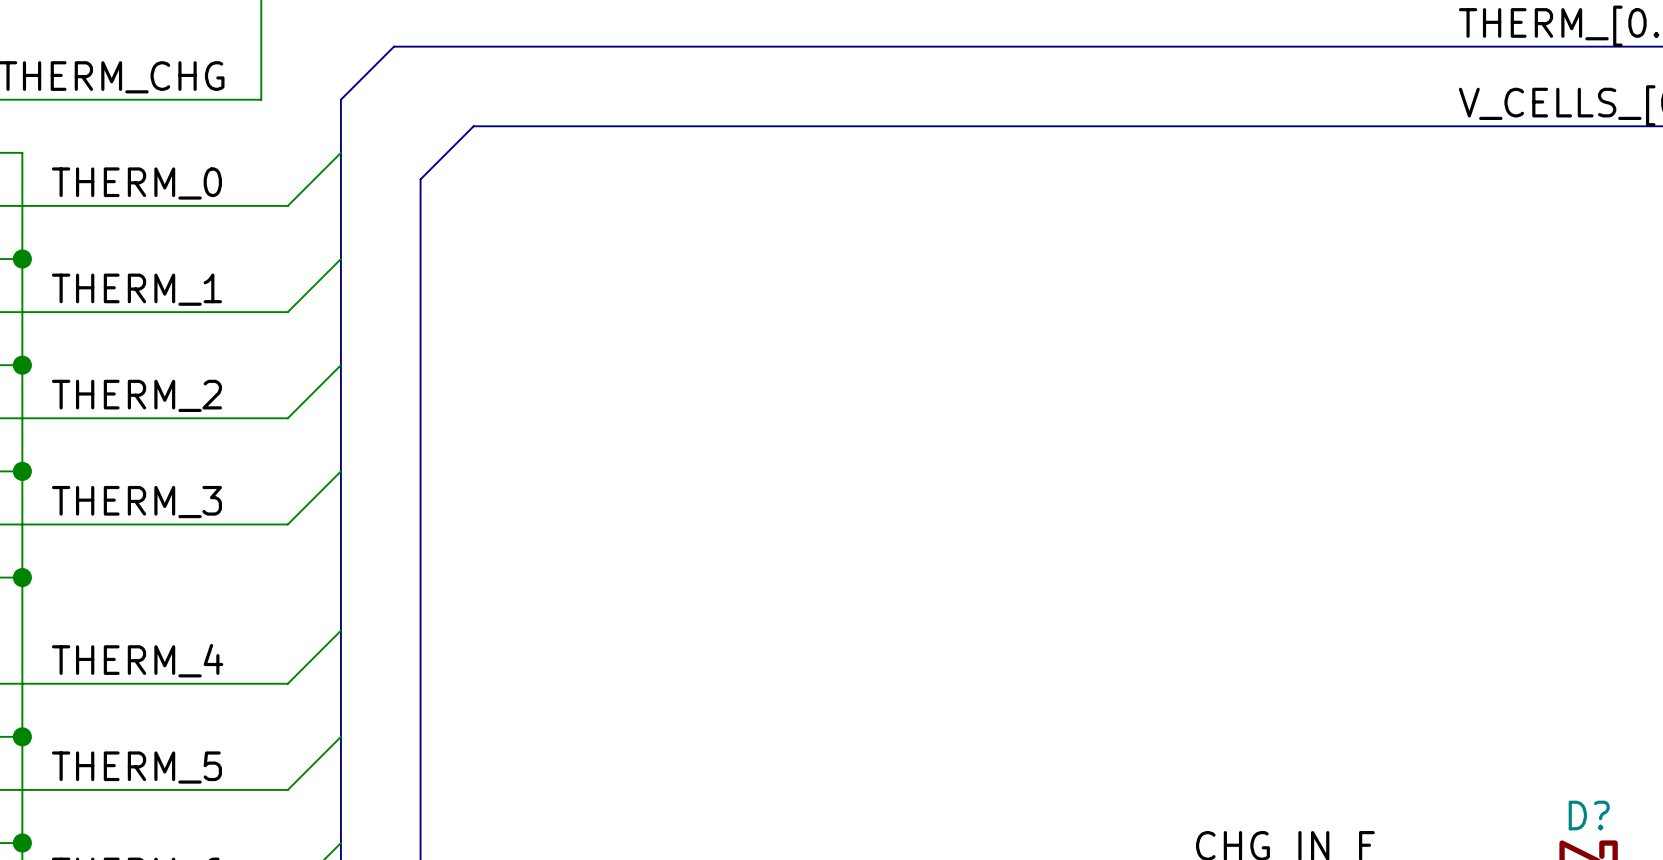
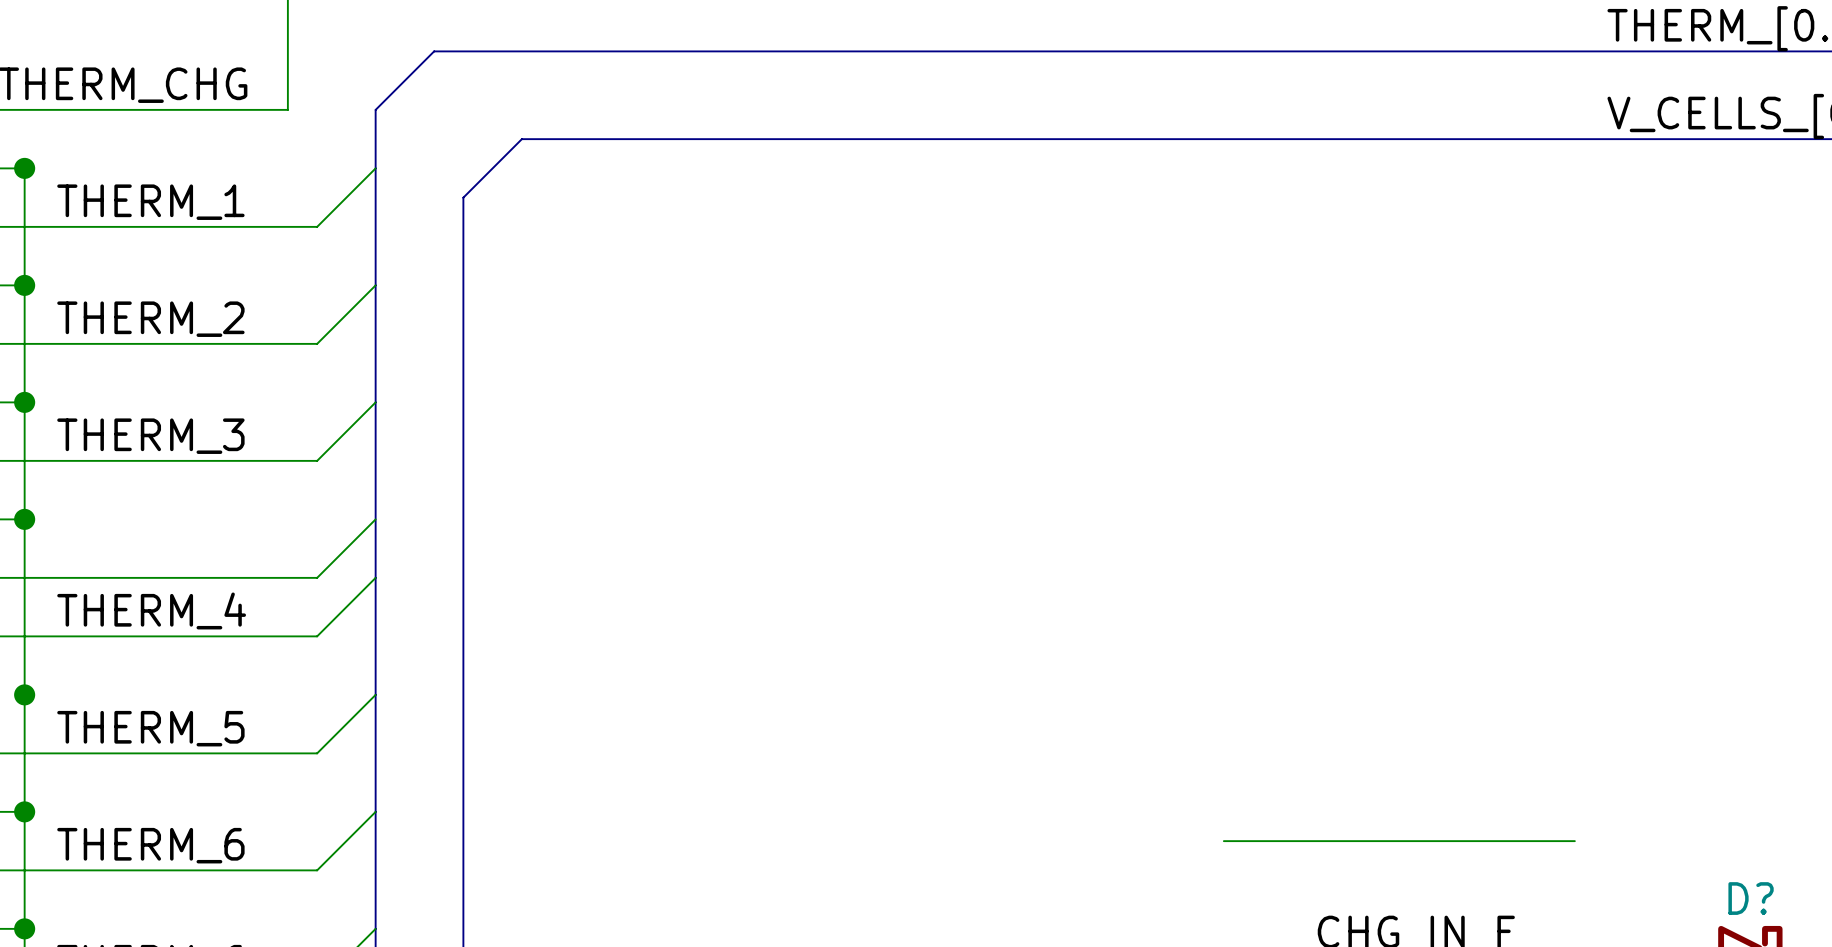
junction: none -> (24, 168)
label: THERM_0 (136, 183) -> THERM_1 (150, 202)
label: THERM_1 (136, 289) -> THERM_2 (150, 319)
label: THERM_2 (136, 395) -> THERM_3 (150, 436)
label: THERM_3 (136, 502) -> THERM_4 (151, 610)
wire: none -> (375, 577) (317, 636) (24, 636)
junction position: (22, 577) -> (24, 694)
label: THERM_4 (137, 660) -> THERM_5 (150, 728)
wire: none -> (1223, 841) (1574, 841)
label: THERM_5 (136, 767) -> THERM_6 (150, 845)

